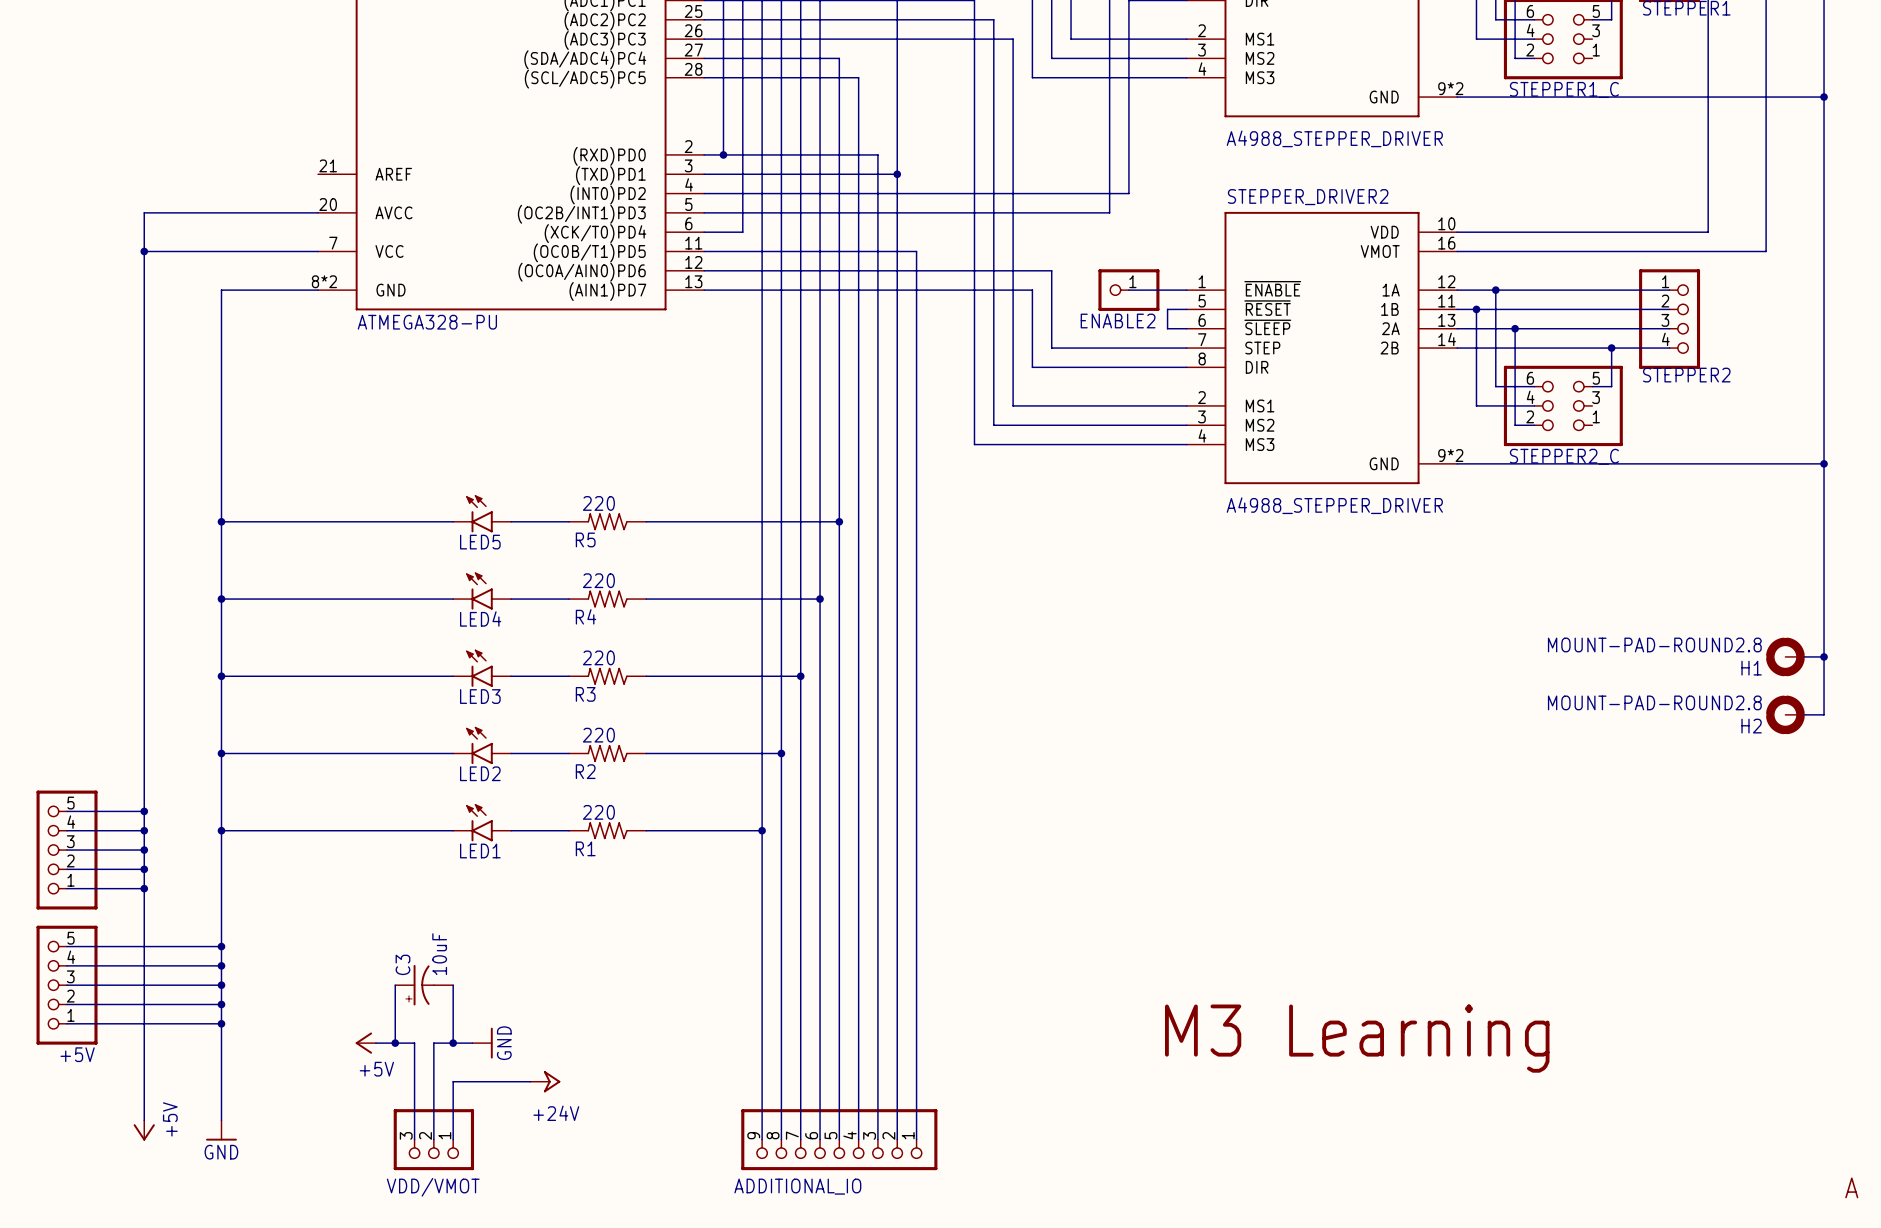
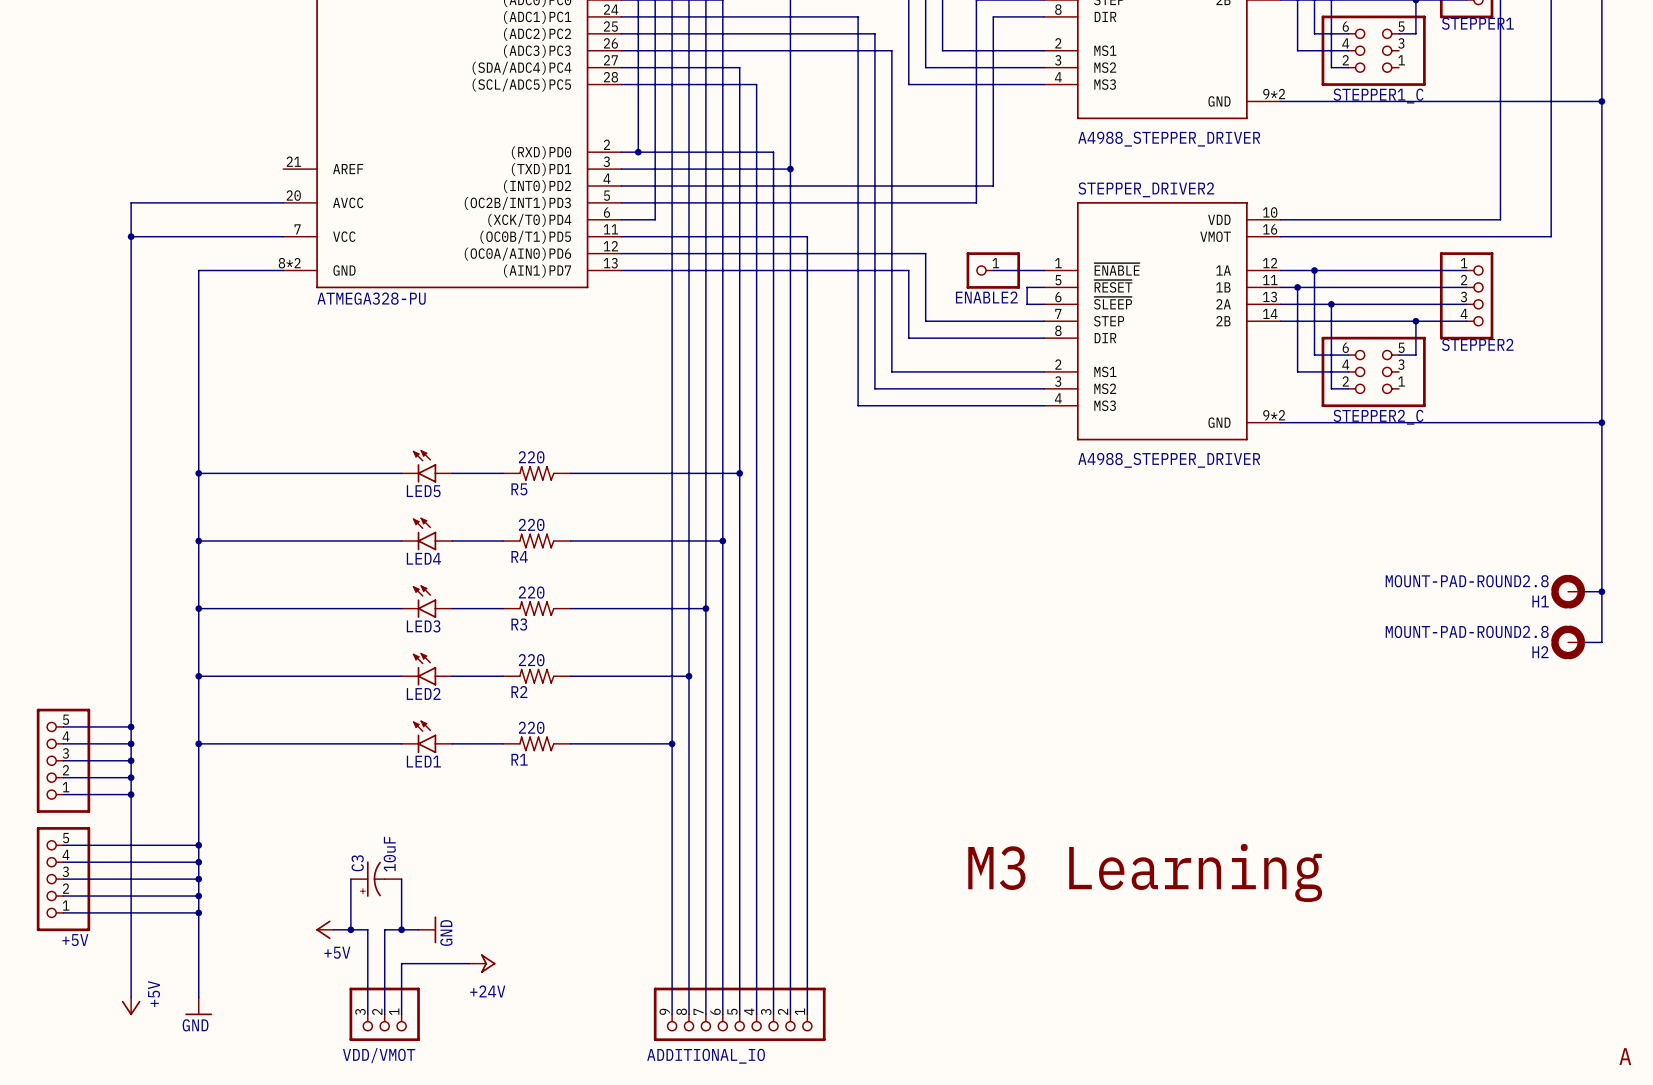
text position: M3 Learning (1357, 1038) -> M3 Learning (1145, 873)

